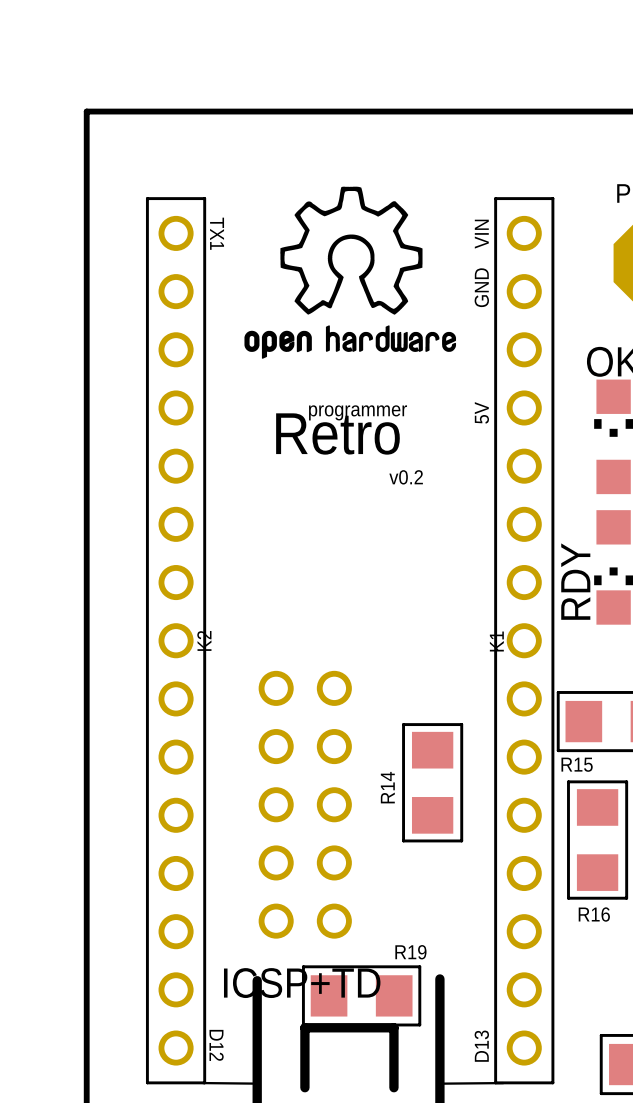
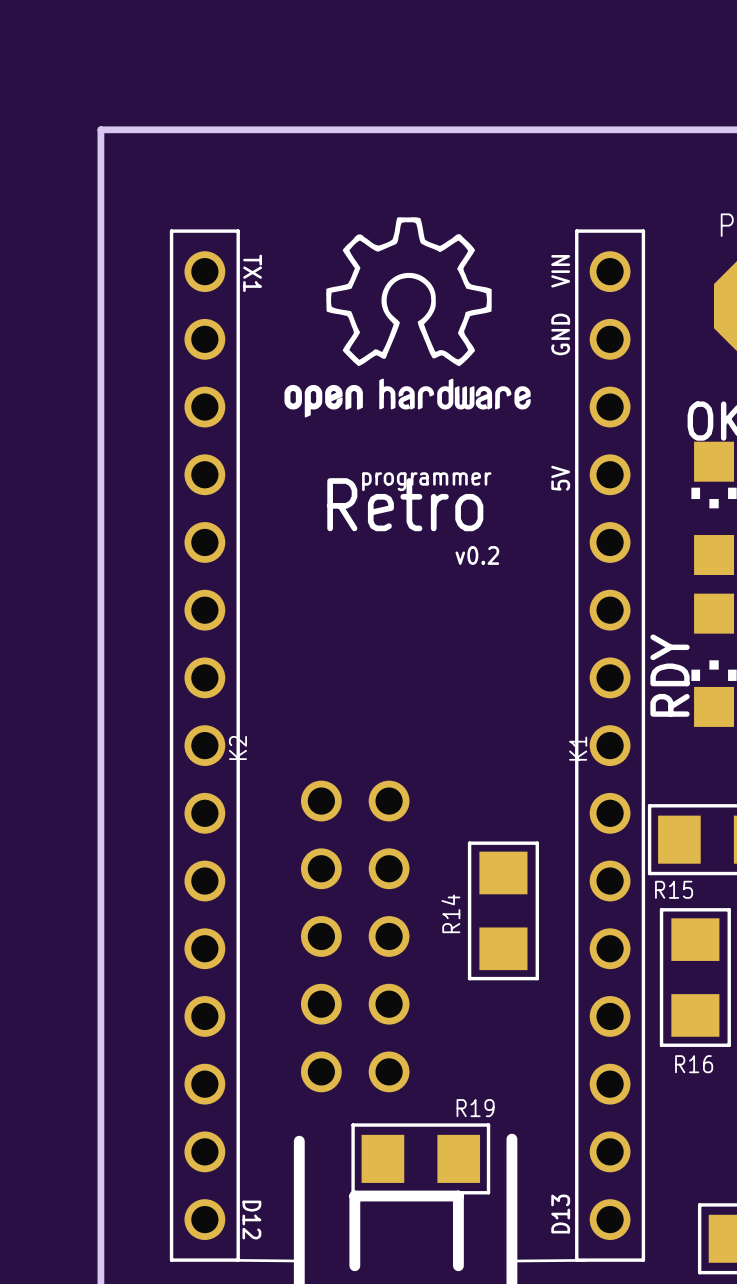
ICSP+TD name: ICSP+TD (302, 983) -> none

